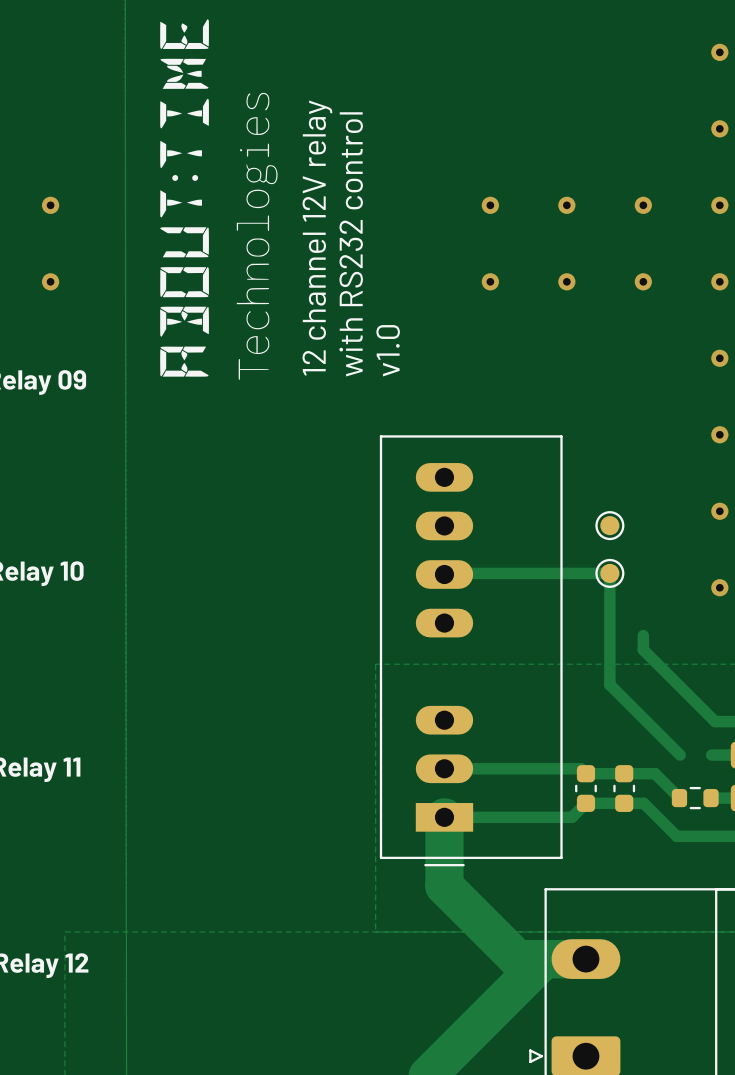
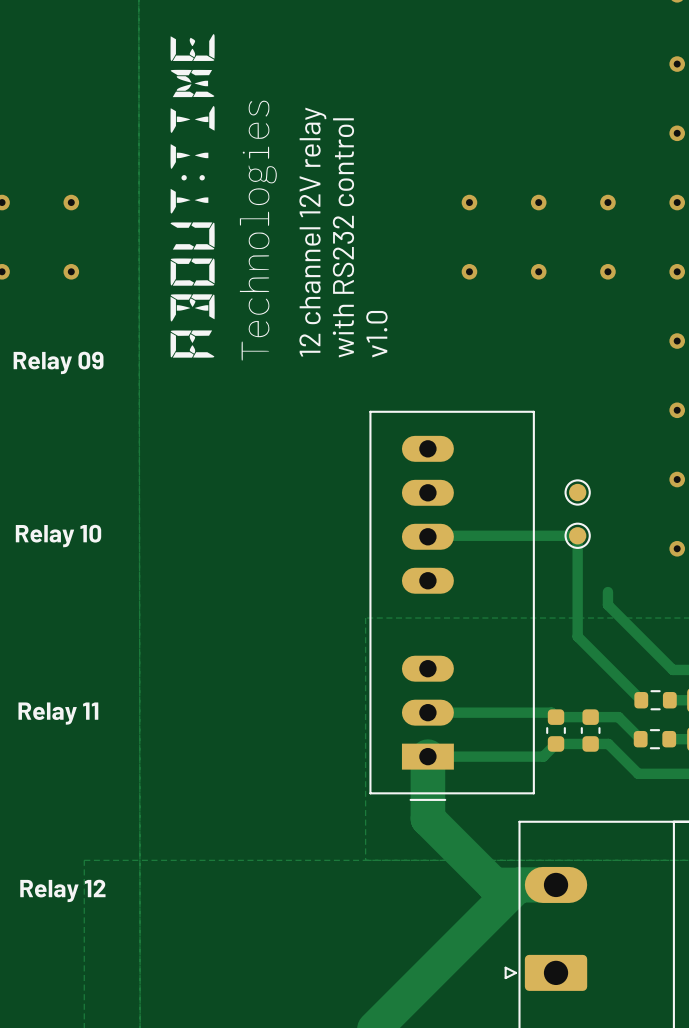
part: none -> (655, 700)

